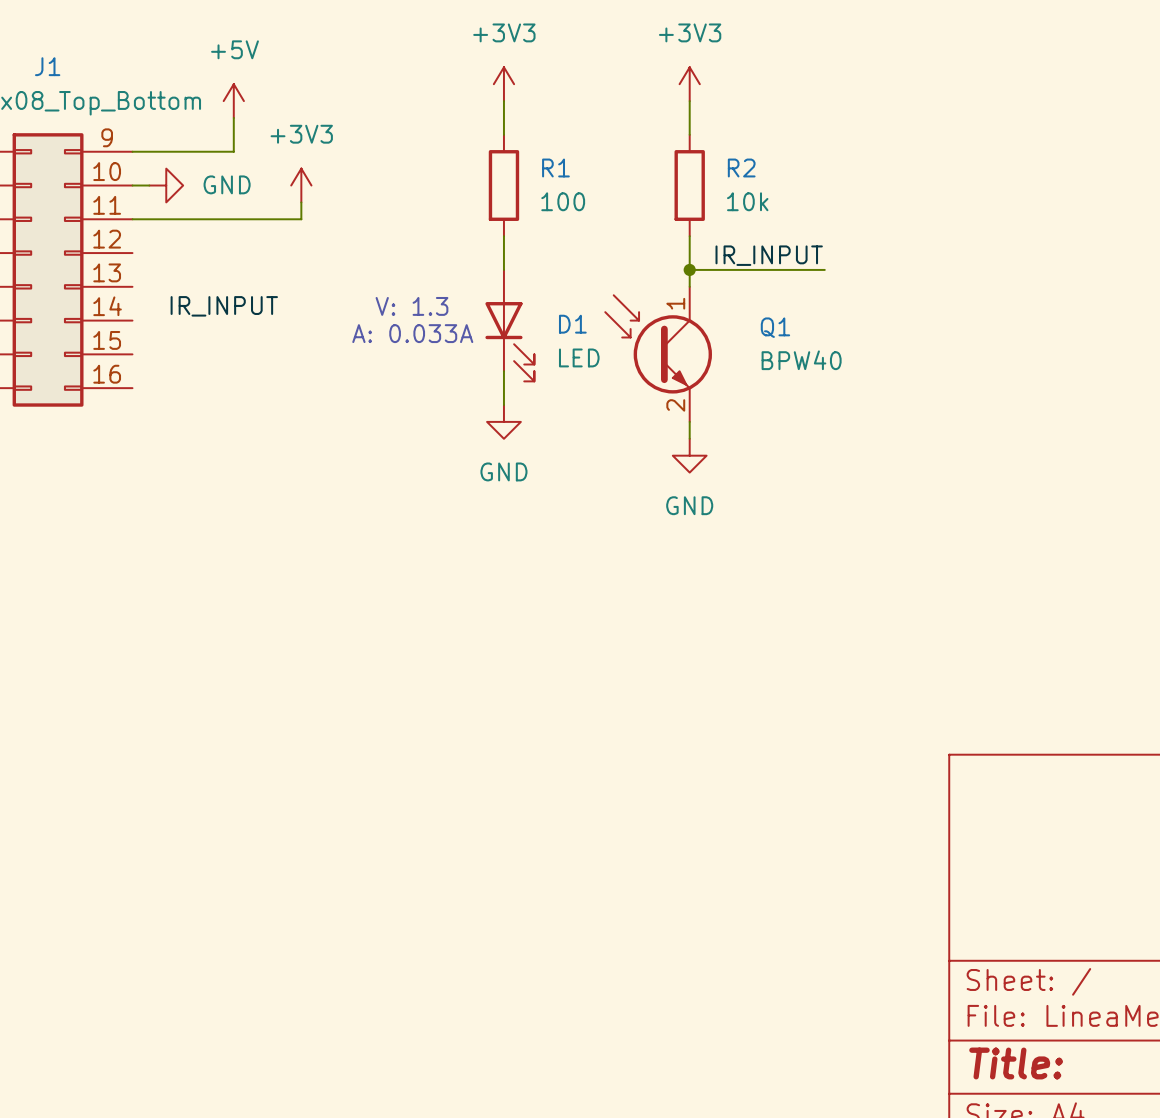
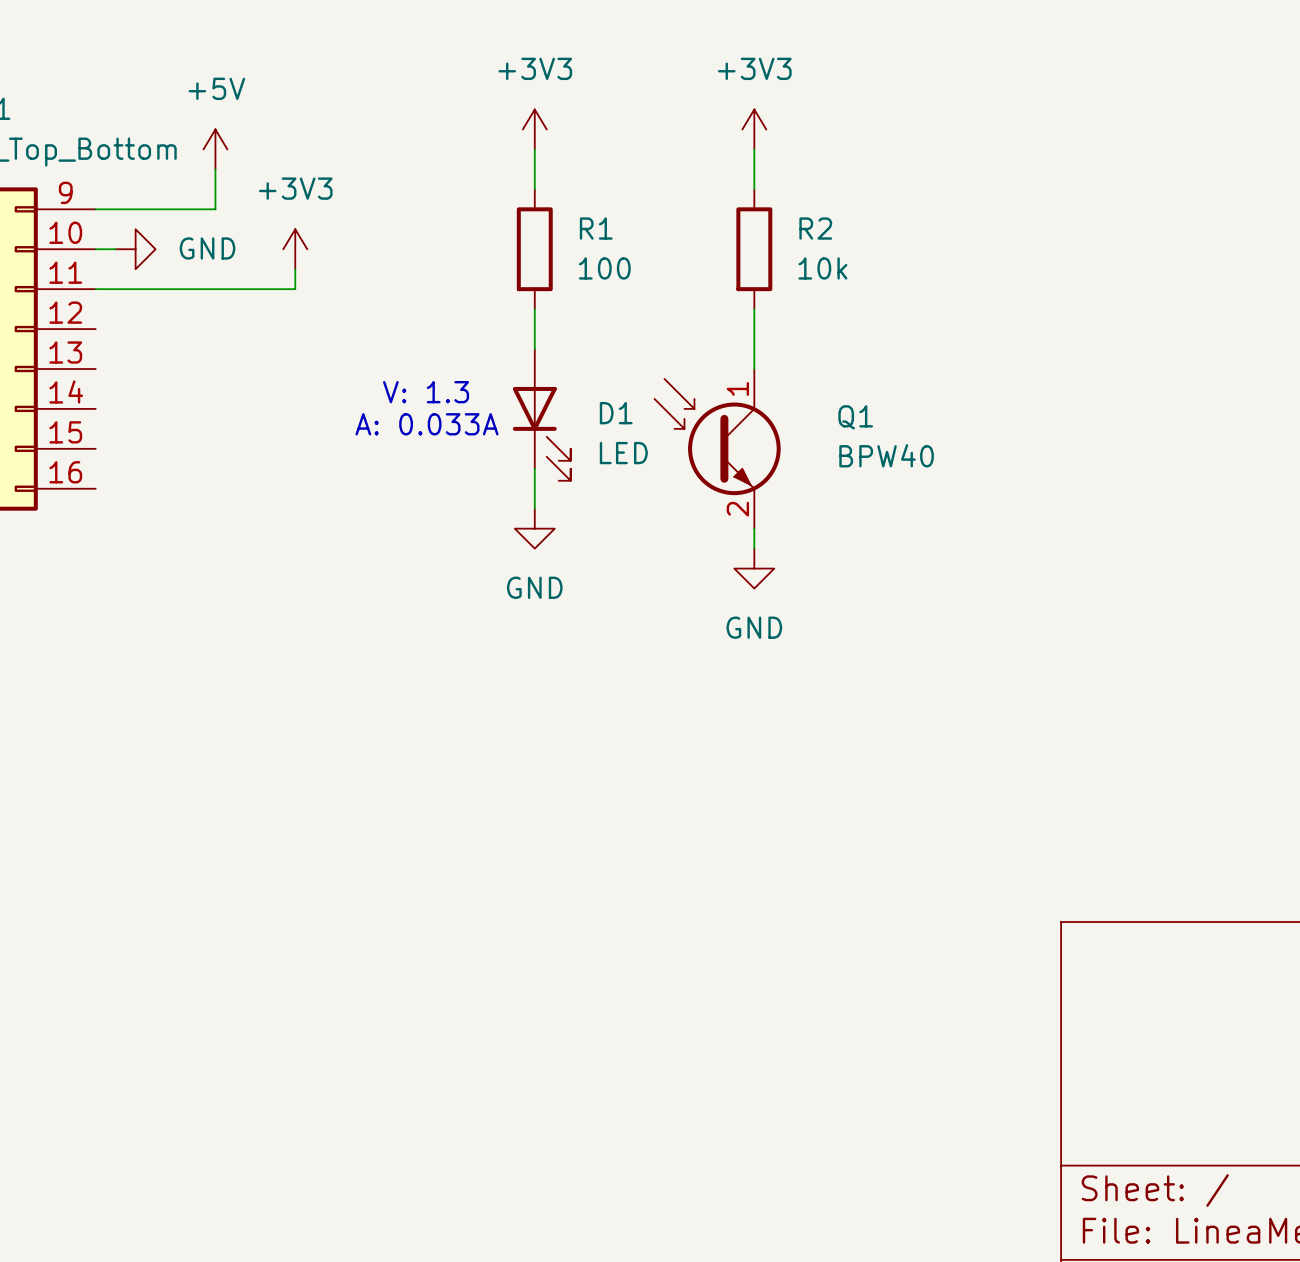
label: IR_INPUT (769, 255) -> none
wire: (689, 269) (824, 269) -> none
junction: (689, 269) -> none
label: IR_INPUT (224, 306) -> none

